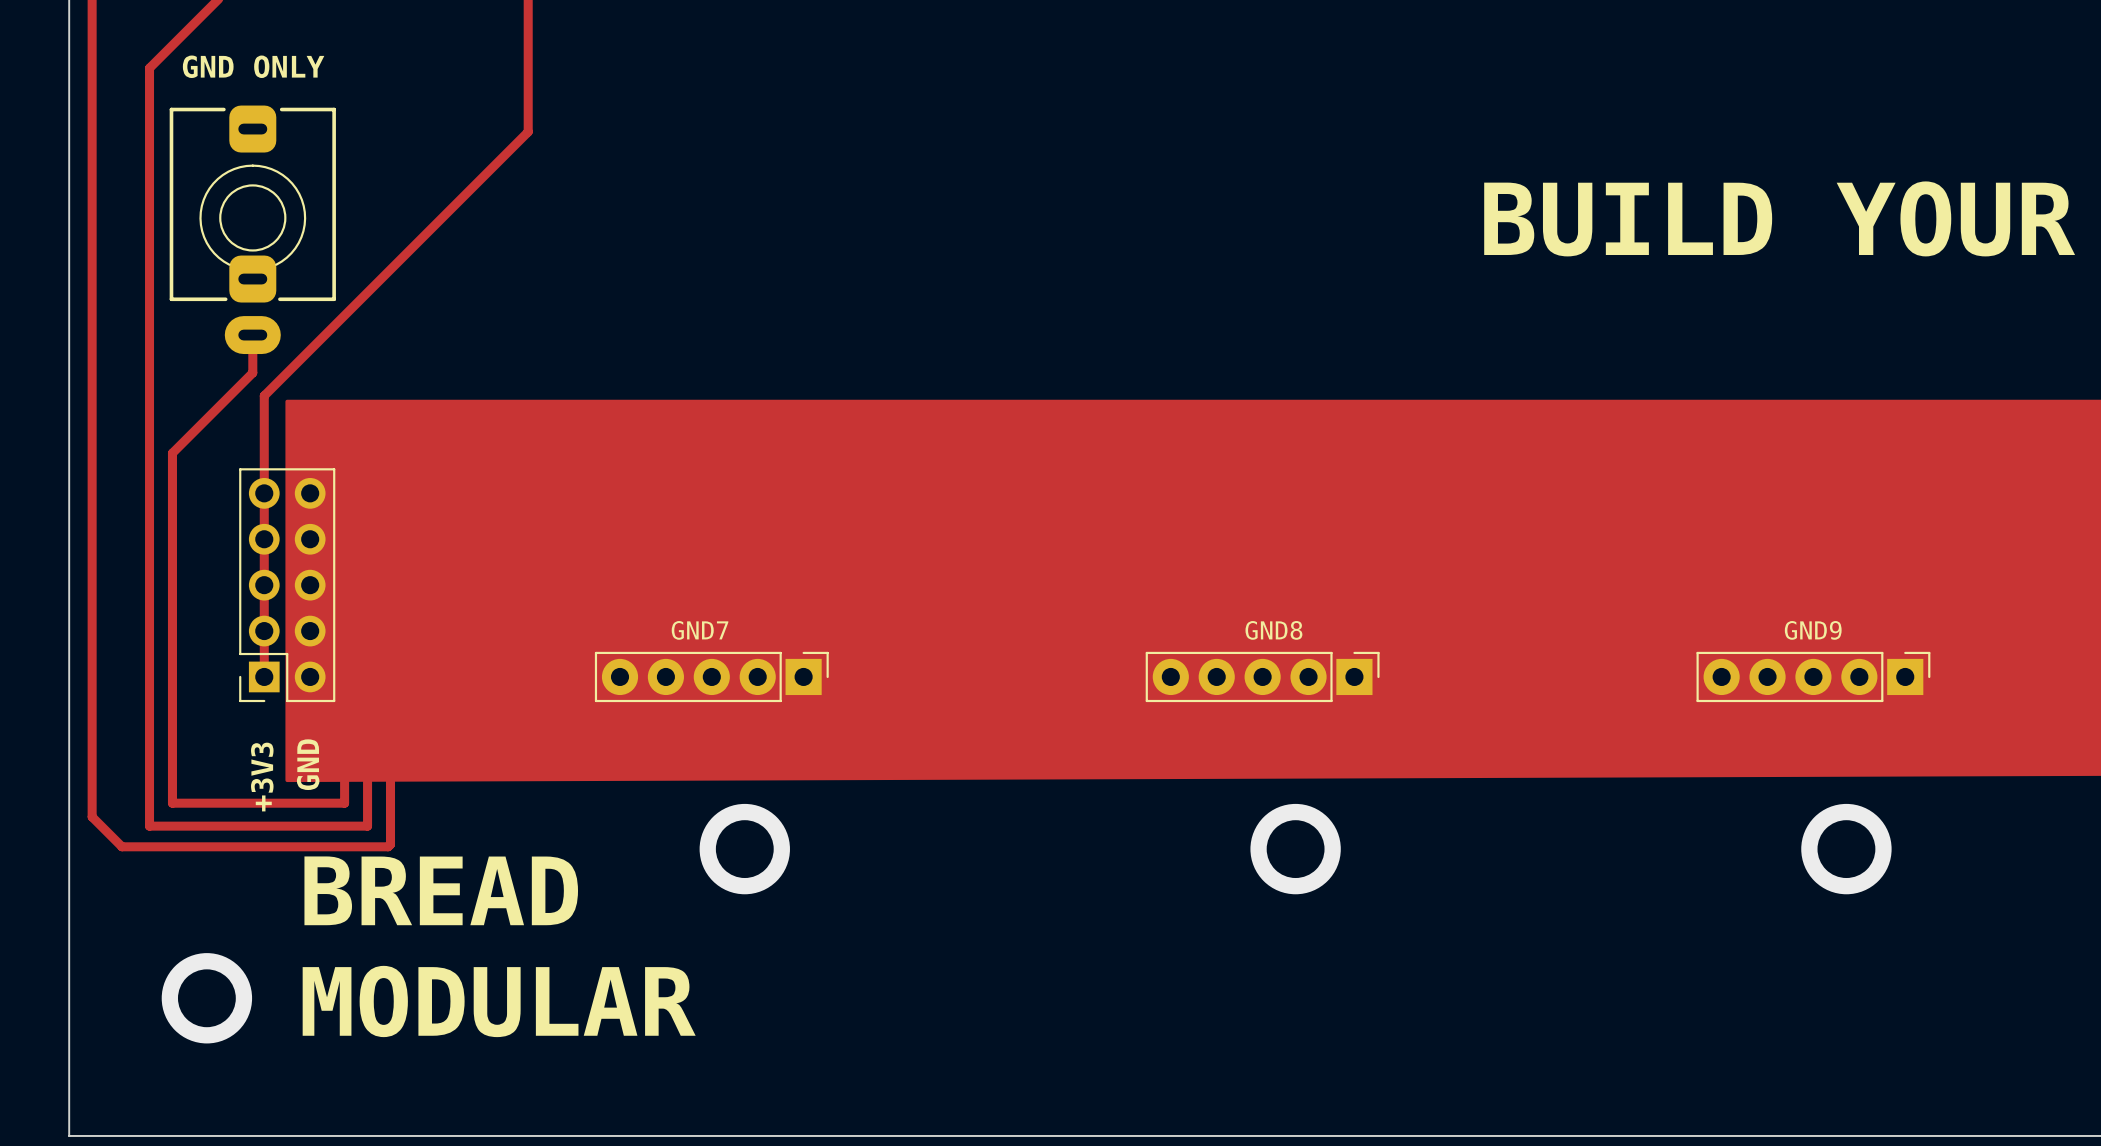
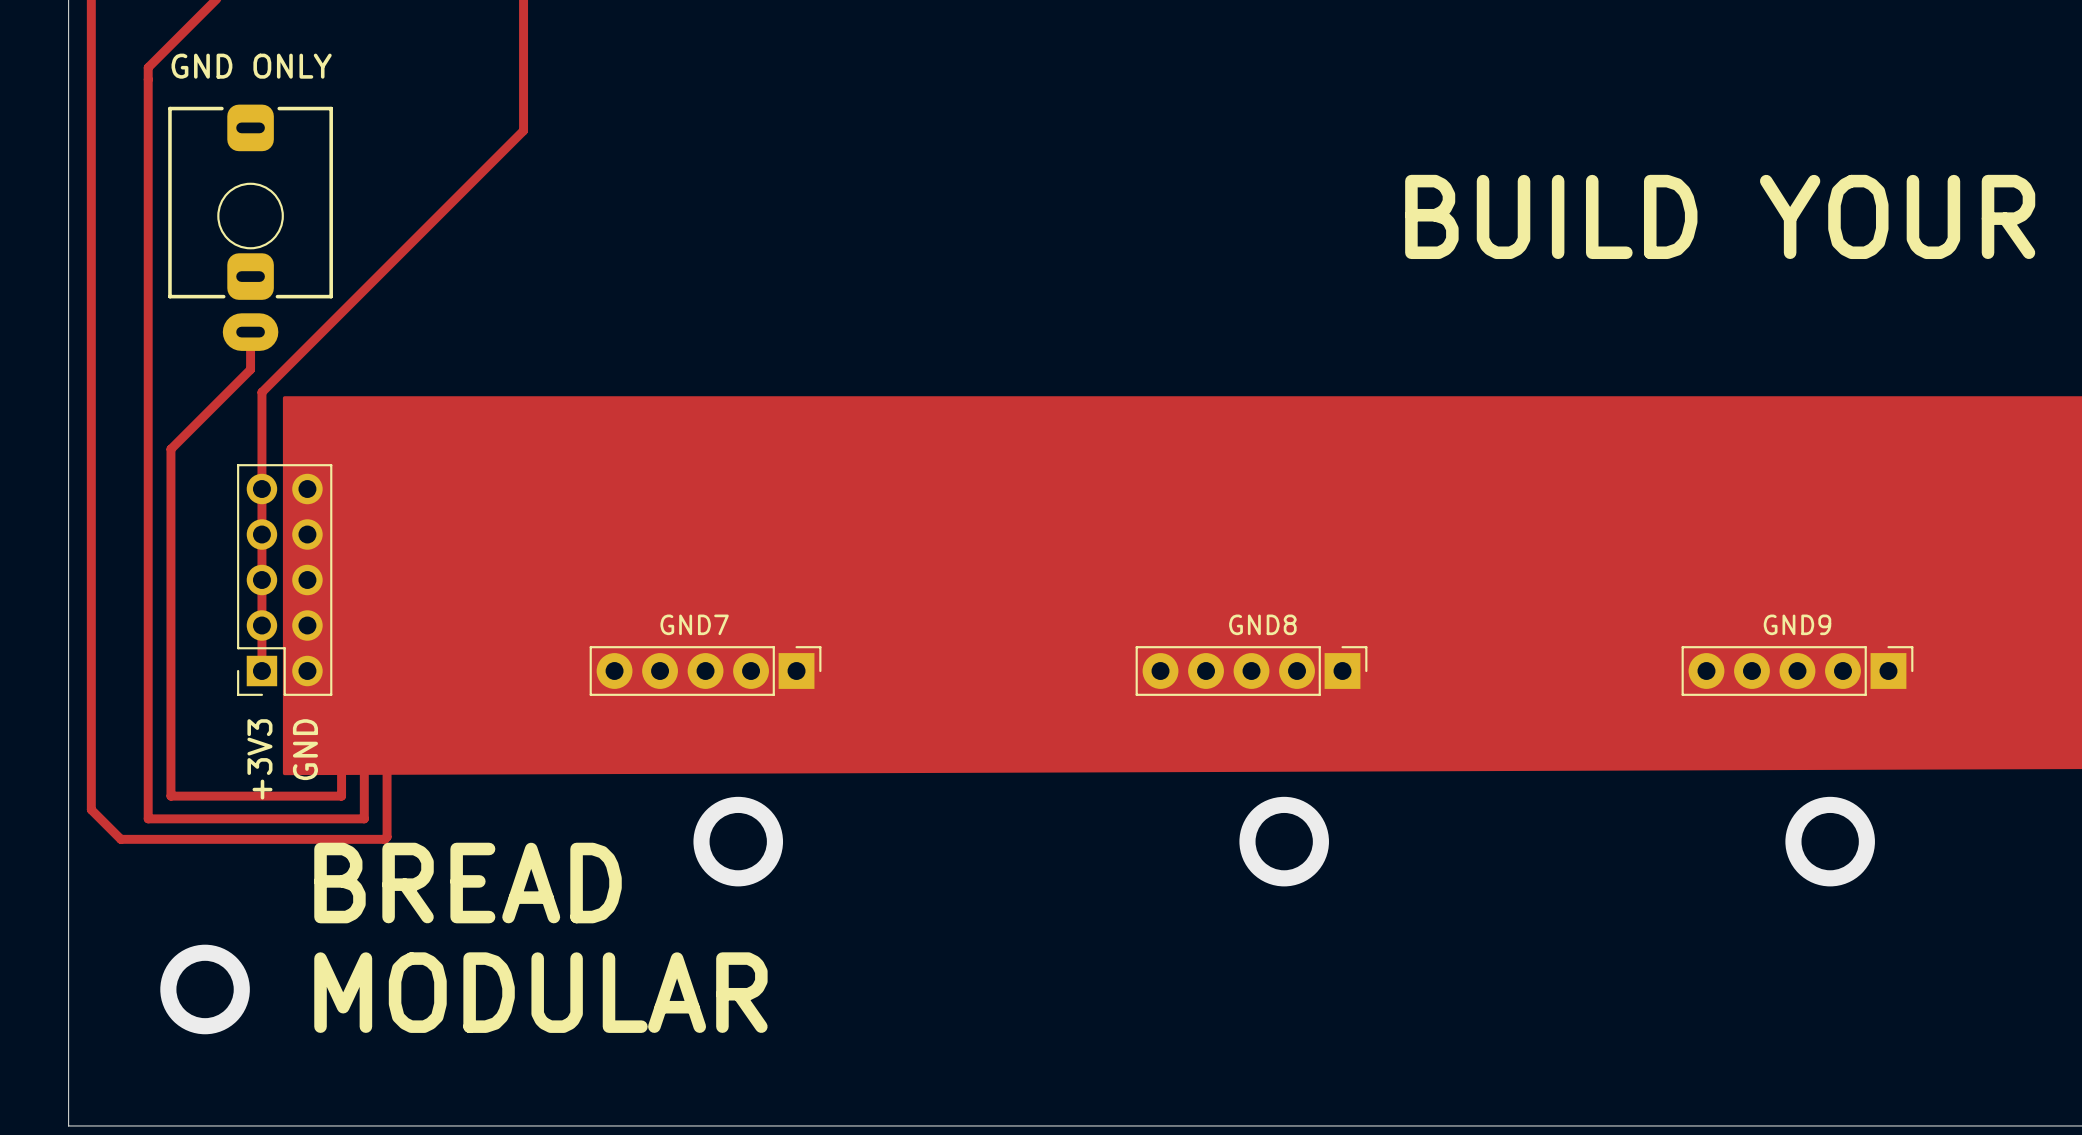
part footprint: [169, 105, 336, 355] -> [168, 104, 333, 351]

